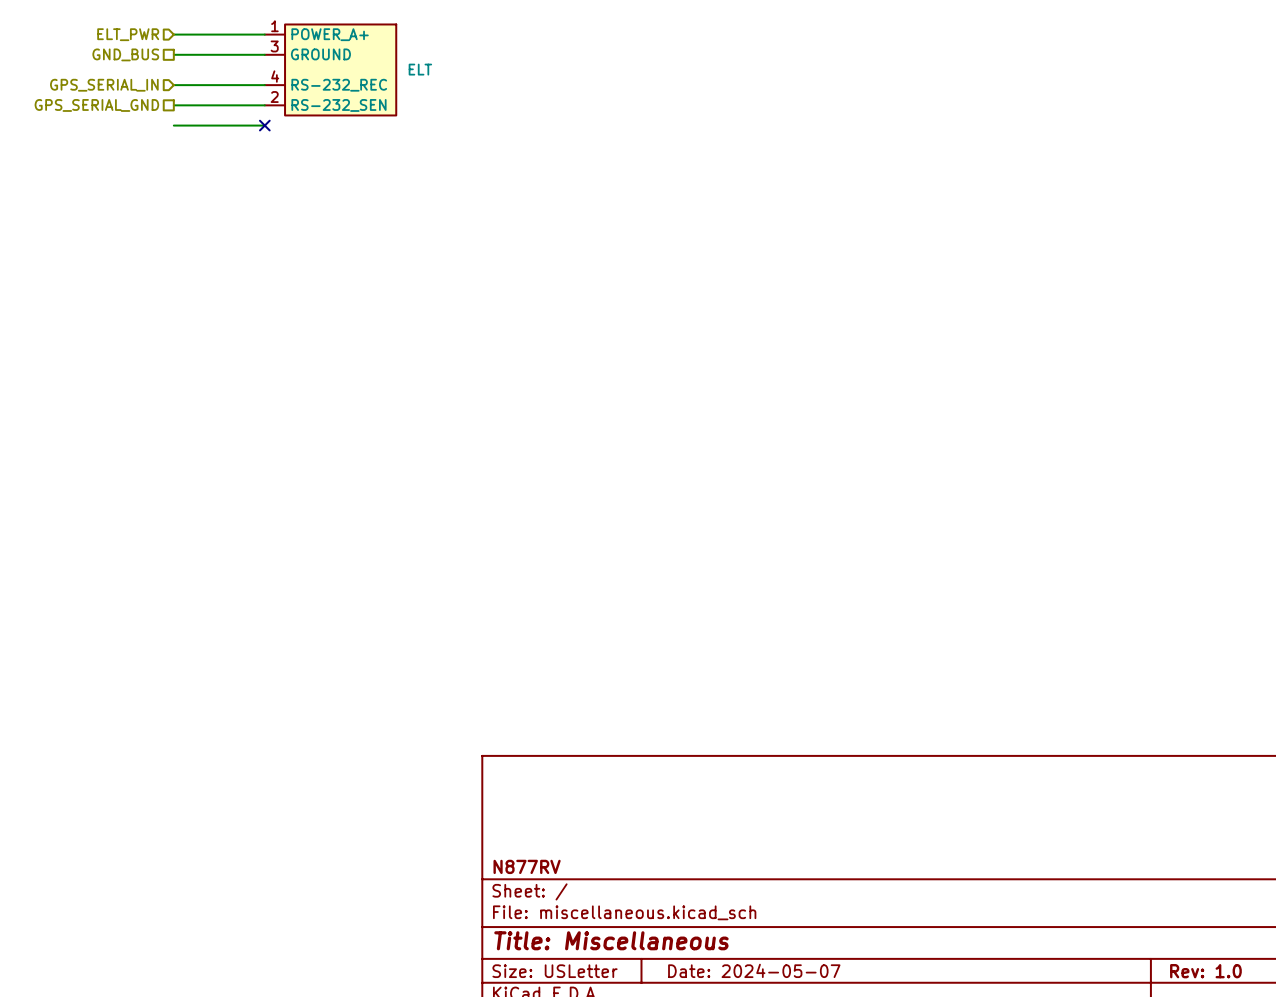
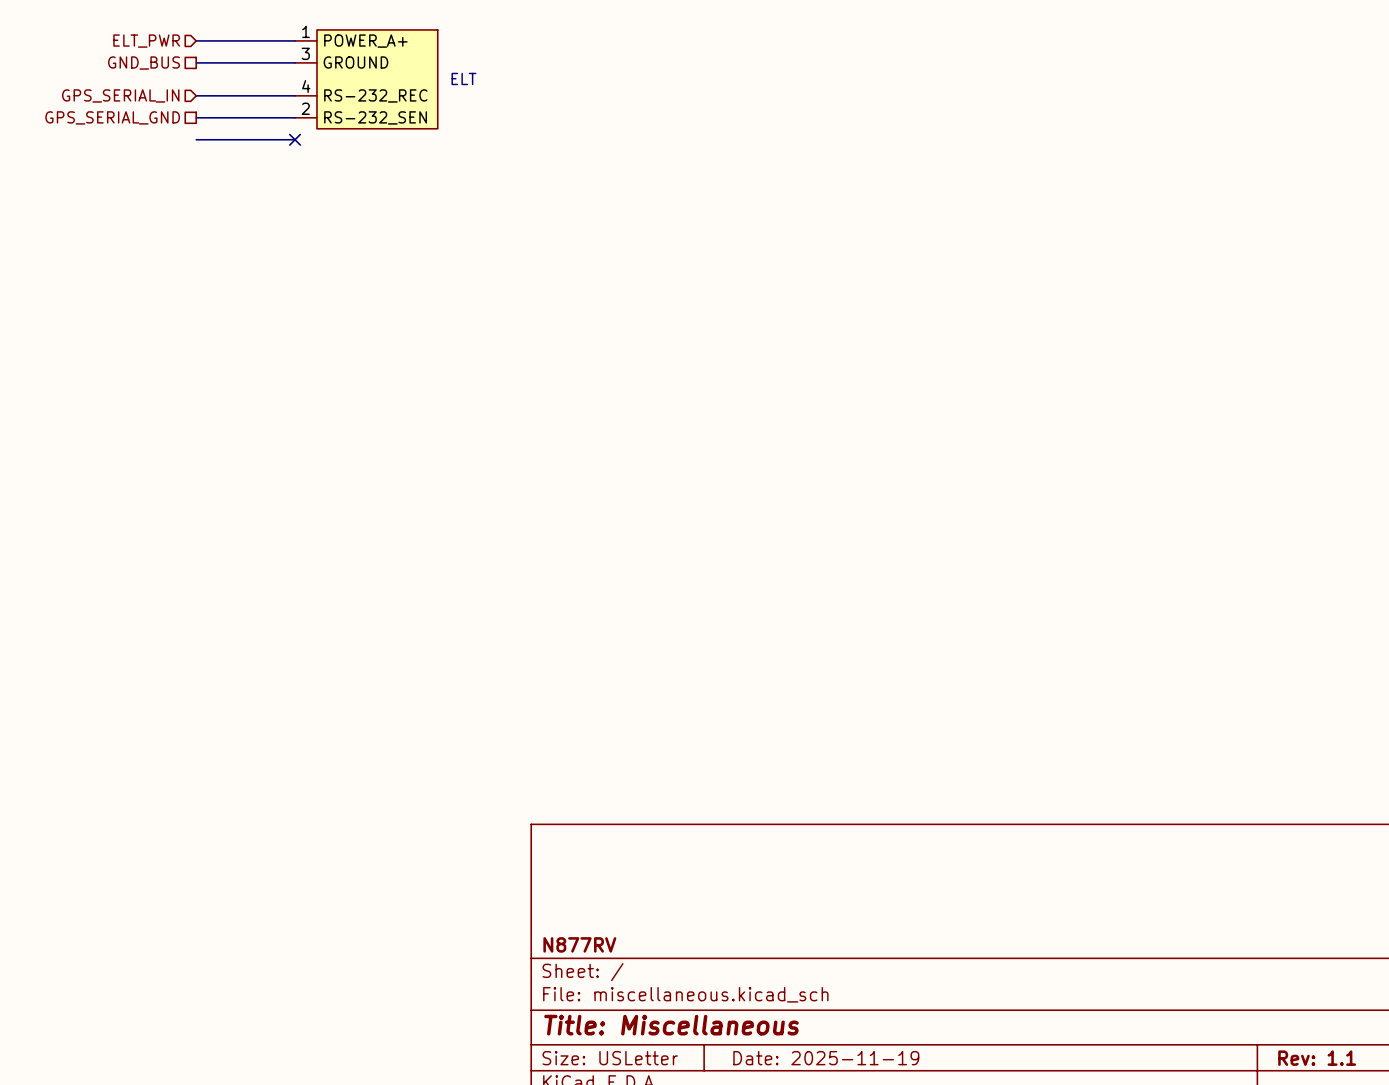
title block: Date: 2024-05-07 (754, 970) -> Date: 2025-11-19 (826, 1058)
title block: Rev: 1.0 (1205, 971) -> Rev: 1.1 (1317, 1058)

